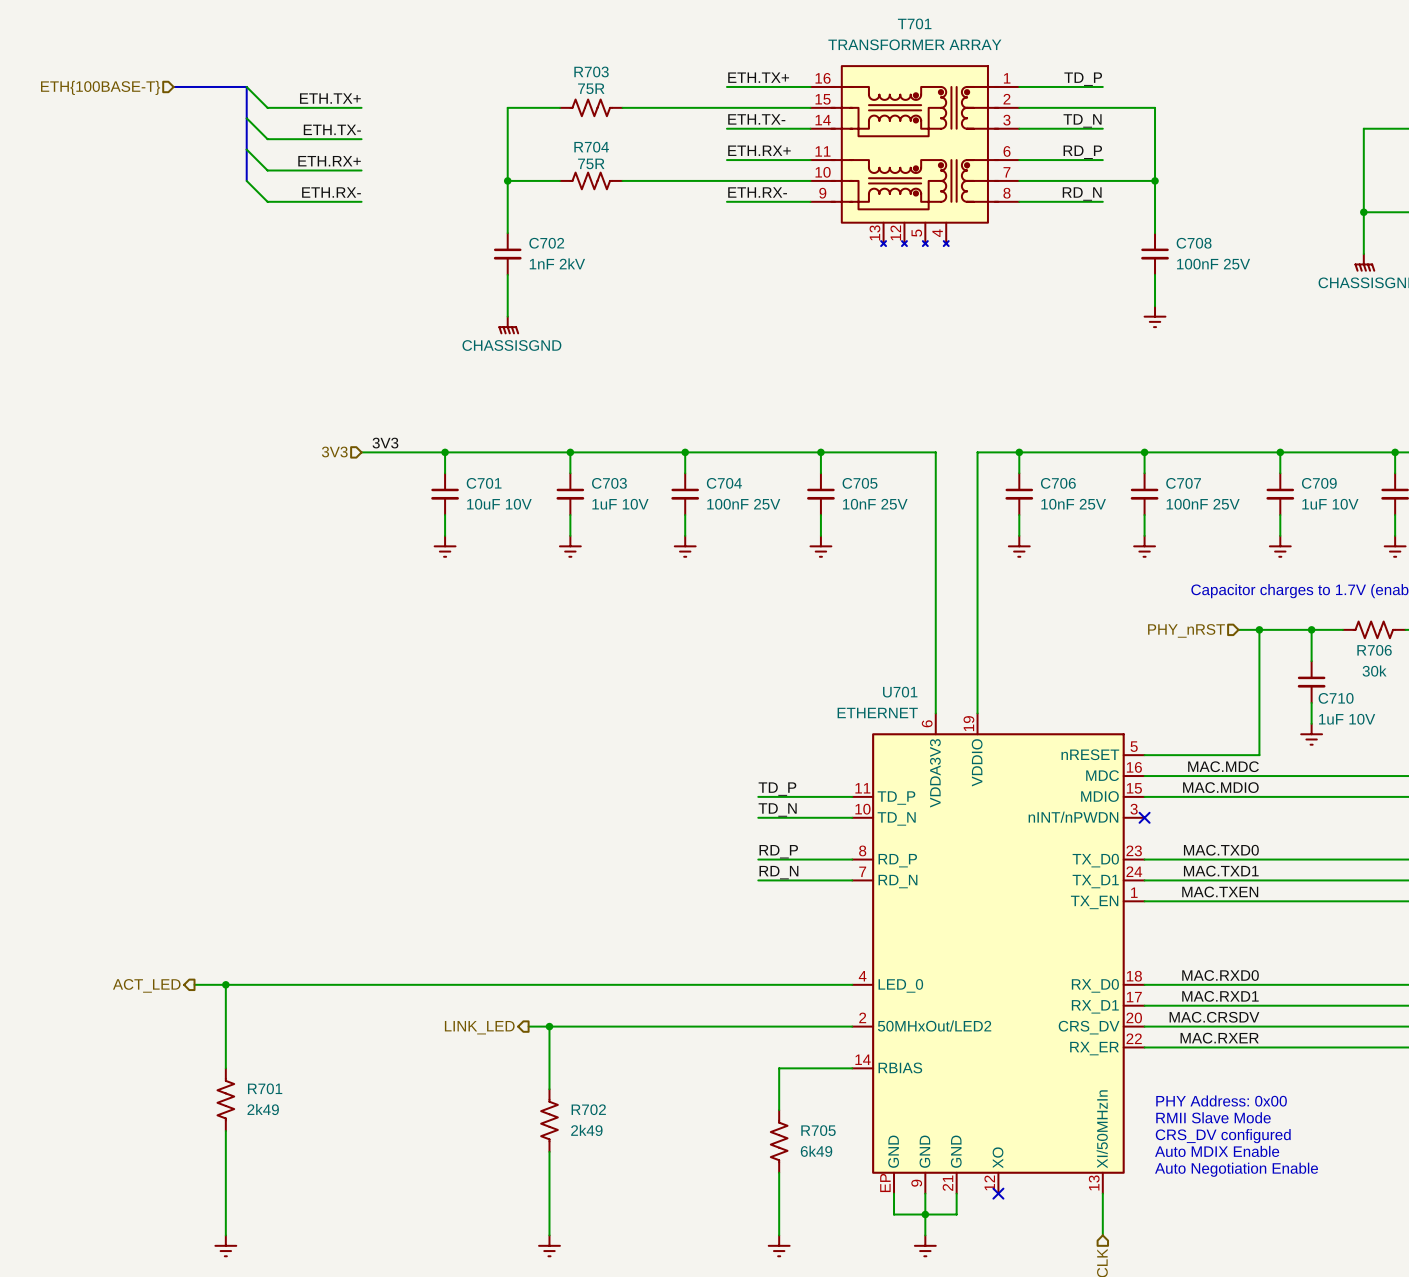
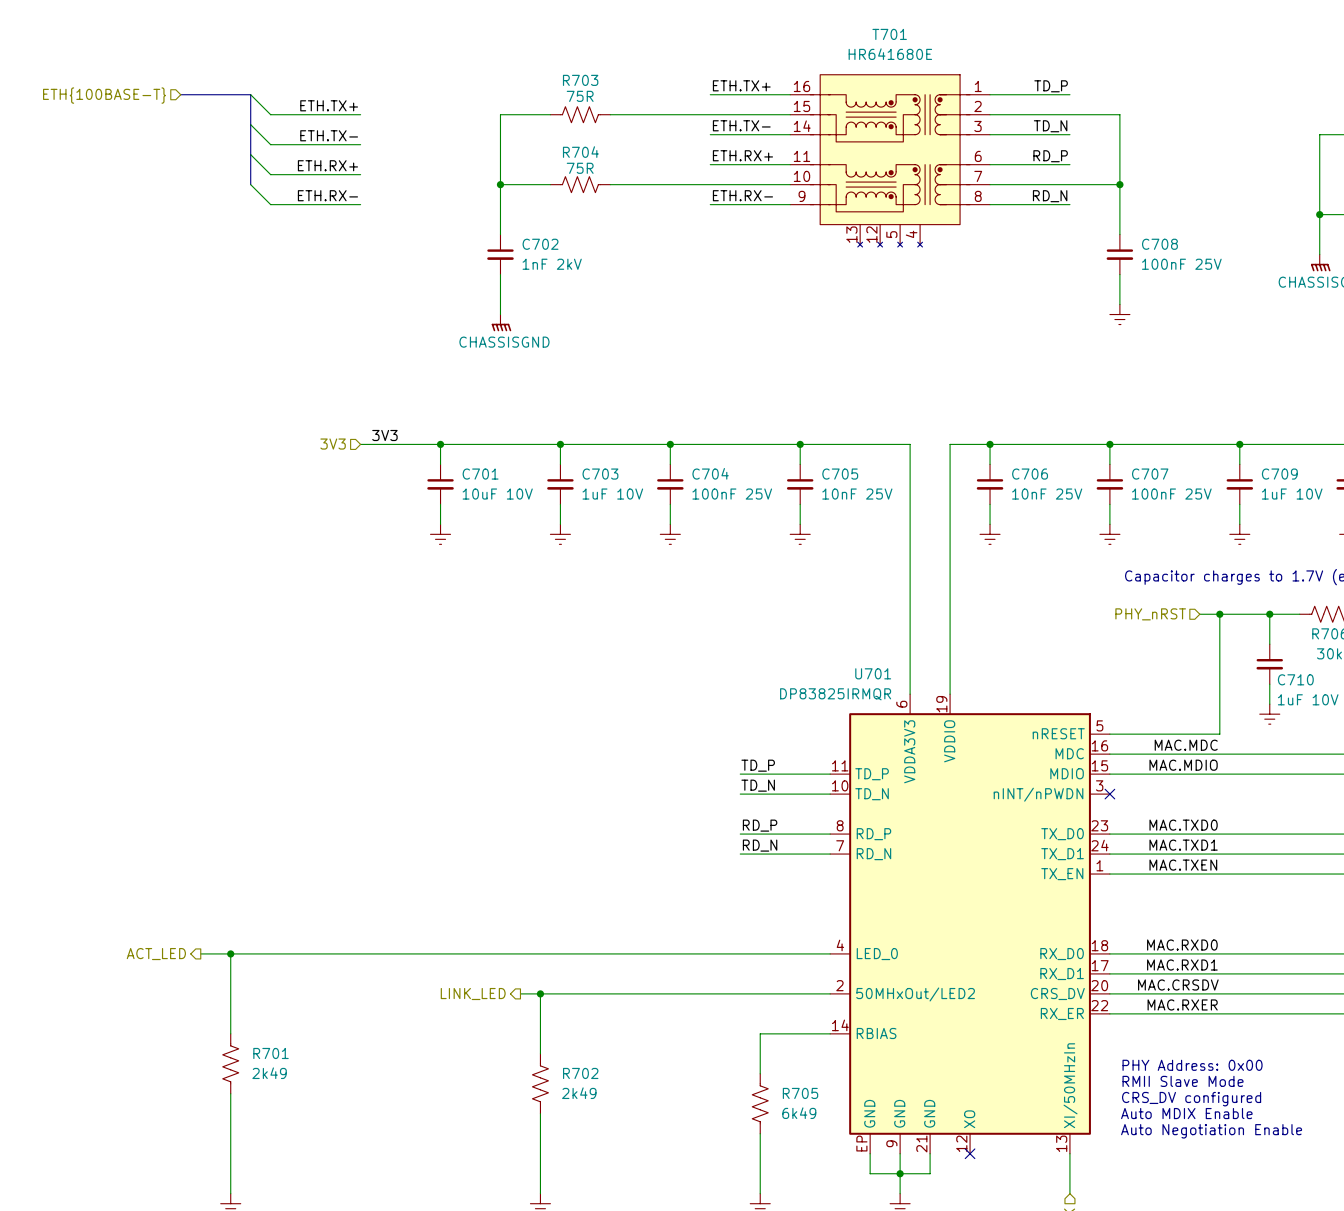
T701 value: TRANSFORMER ARRAY (914, 44) -> HR641680E (890, 54)
U701 value: ETHERNET (877, 713) -> DP83825IRMQR (835, 694)

